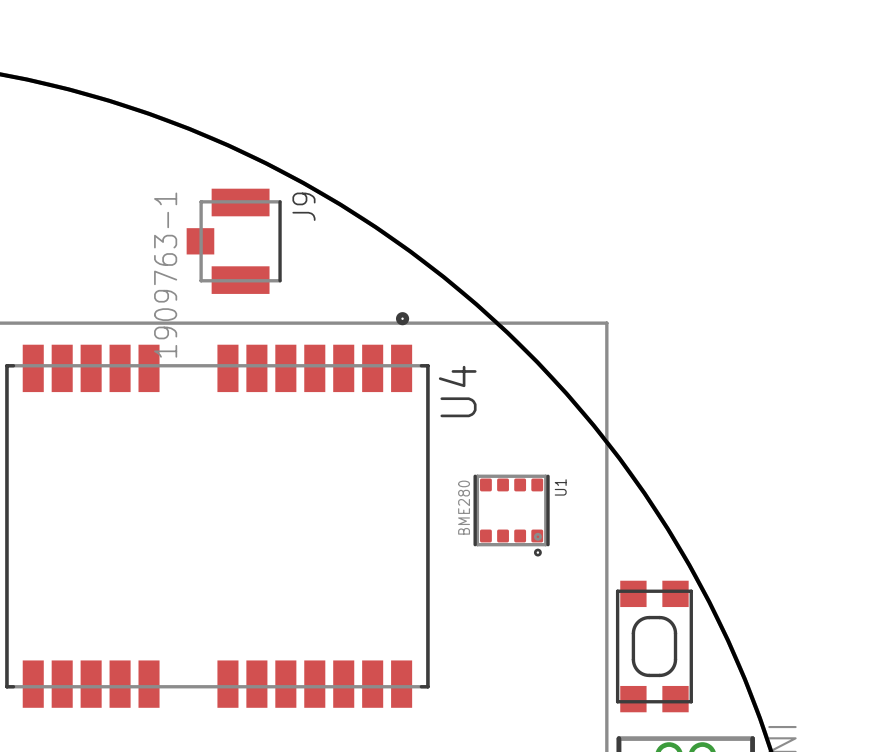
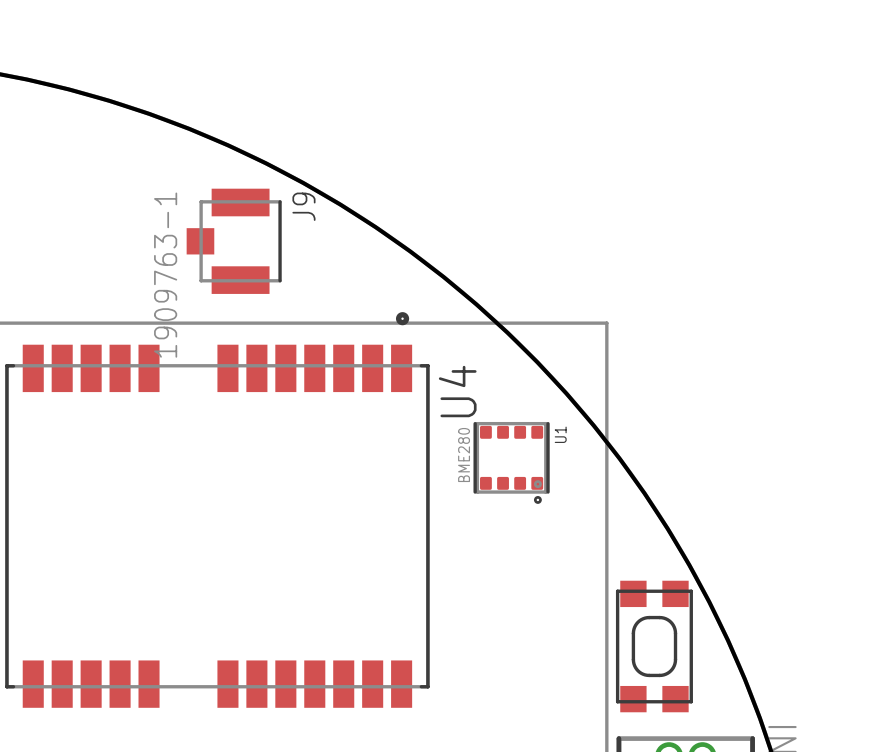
U1 position: (511, 515) -> (511, 462)

